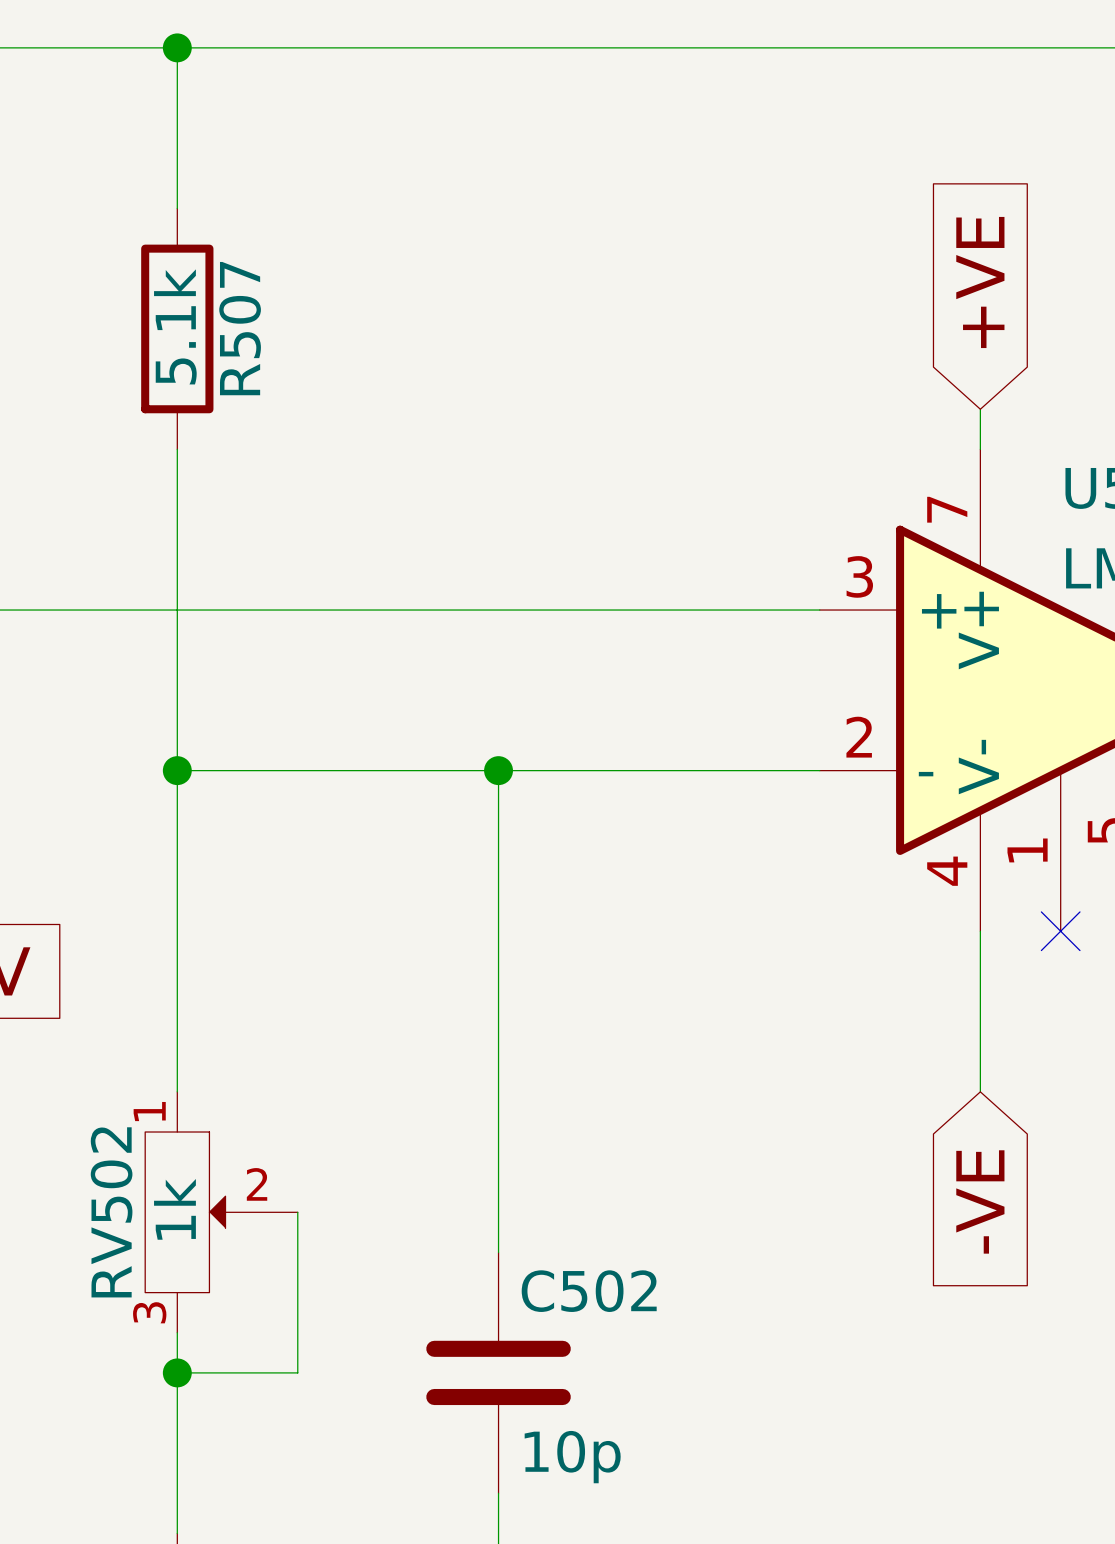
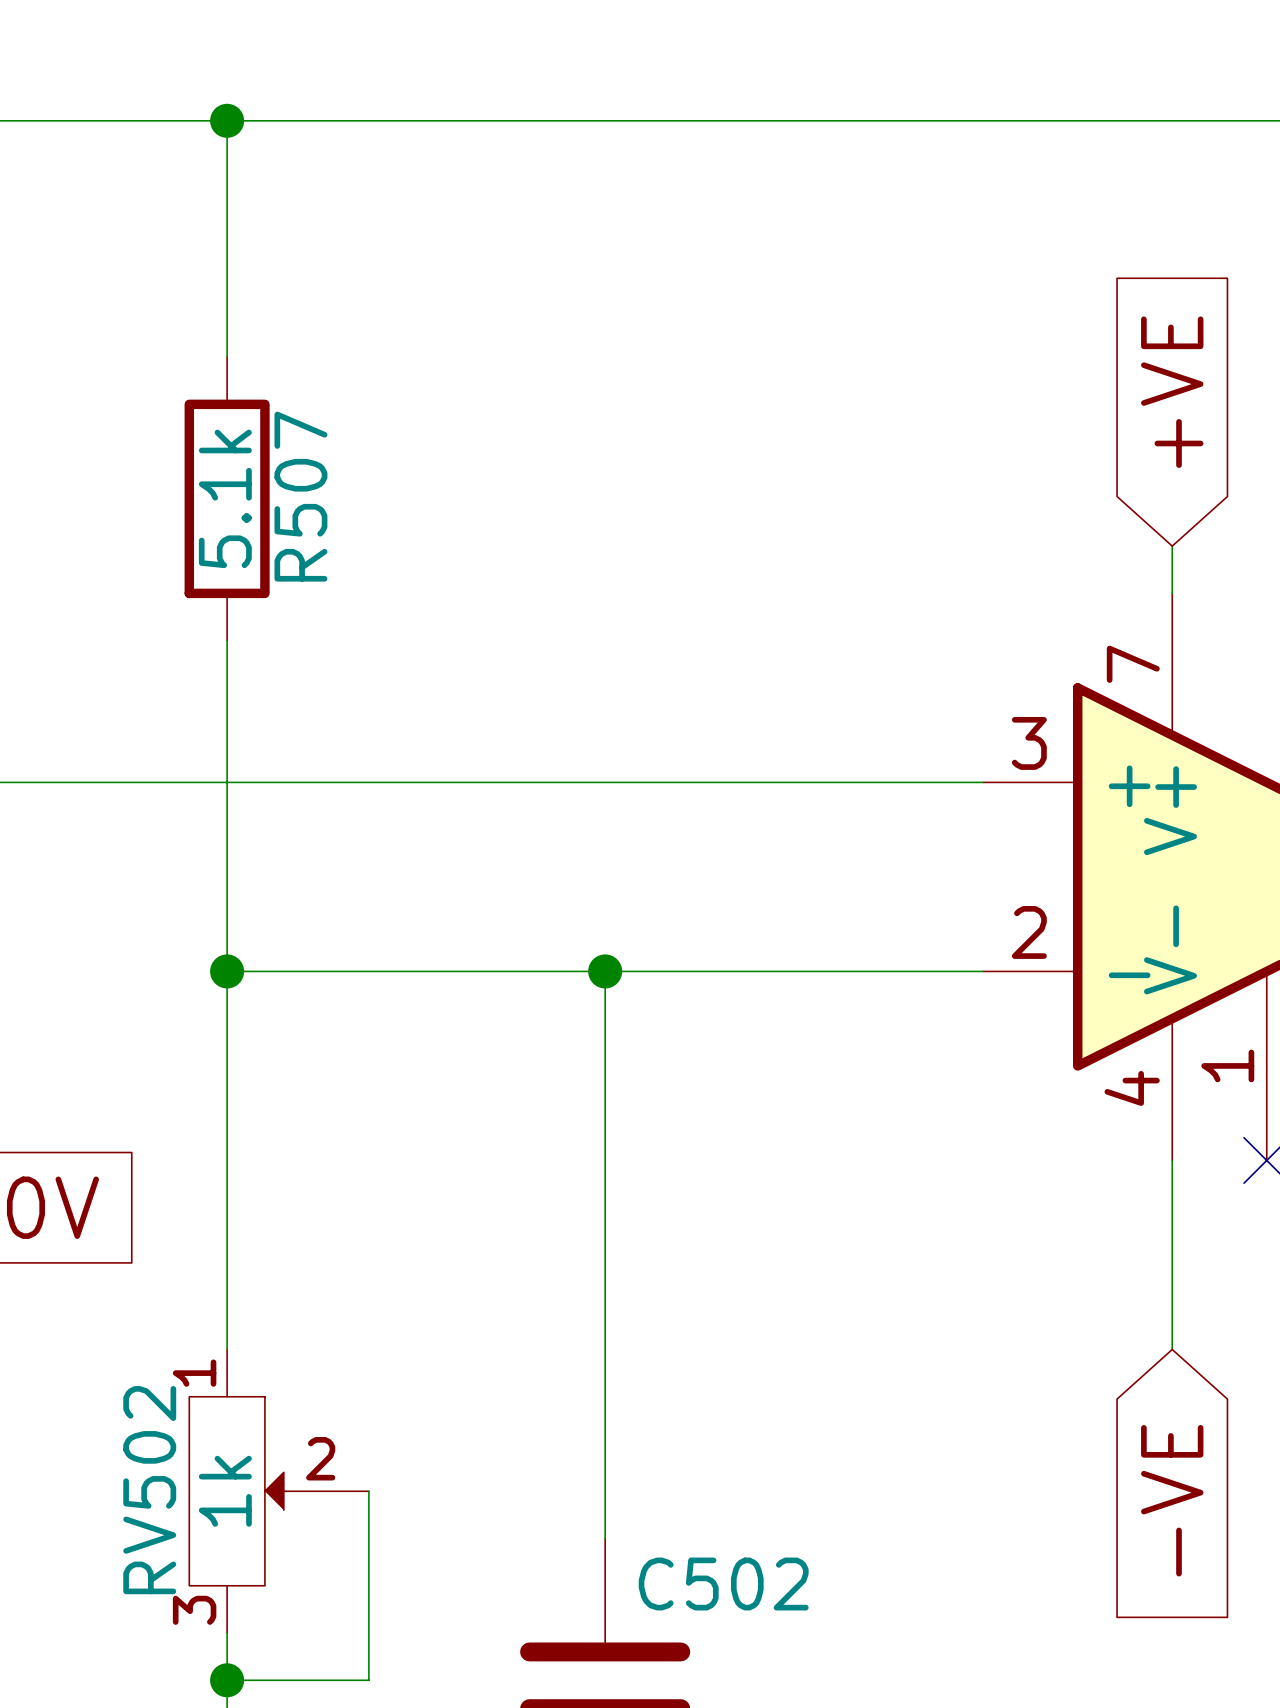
R507 position: (177, 328) -> (227, 498)

